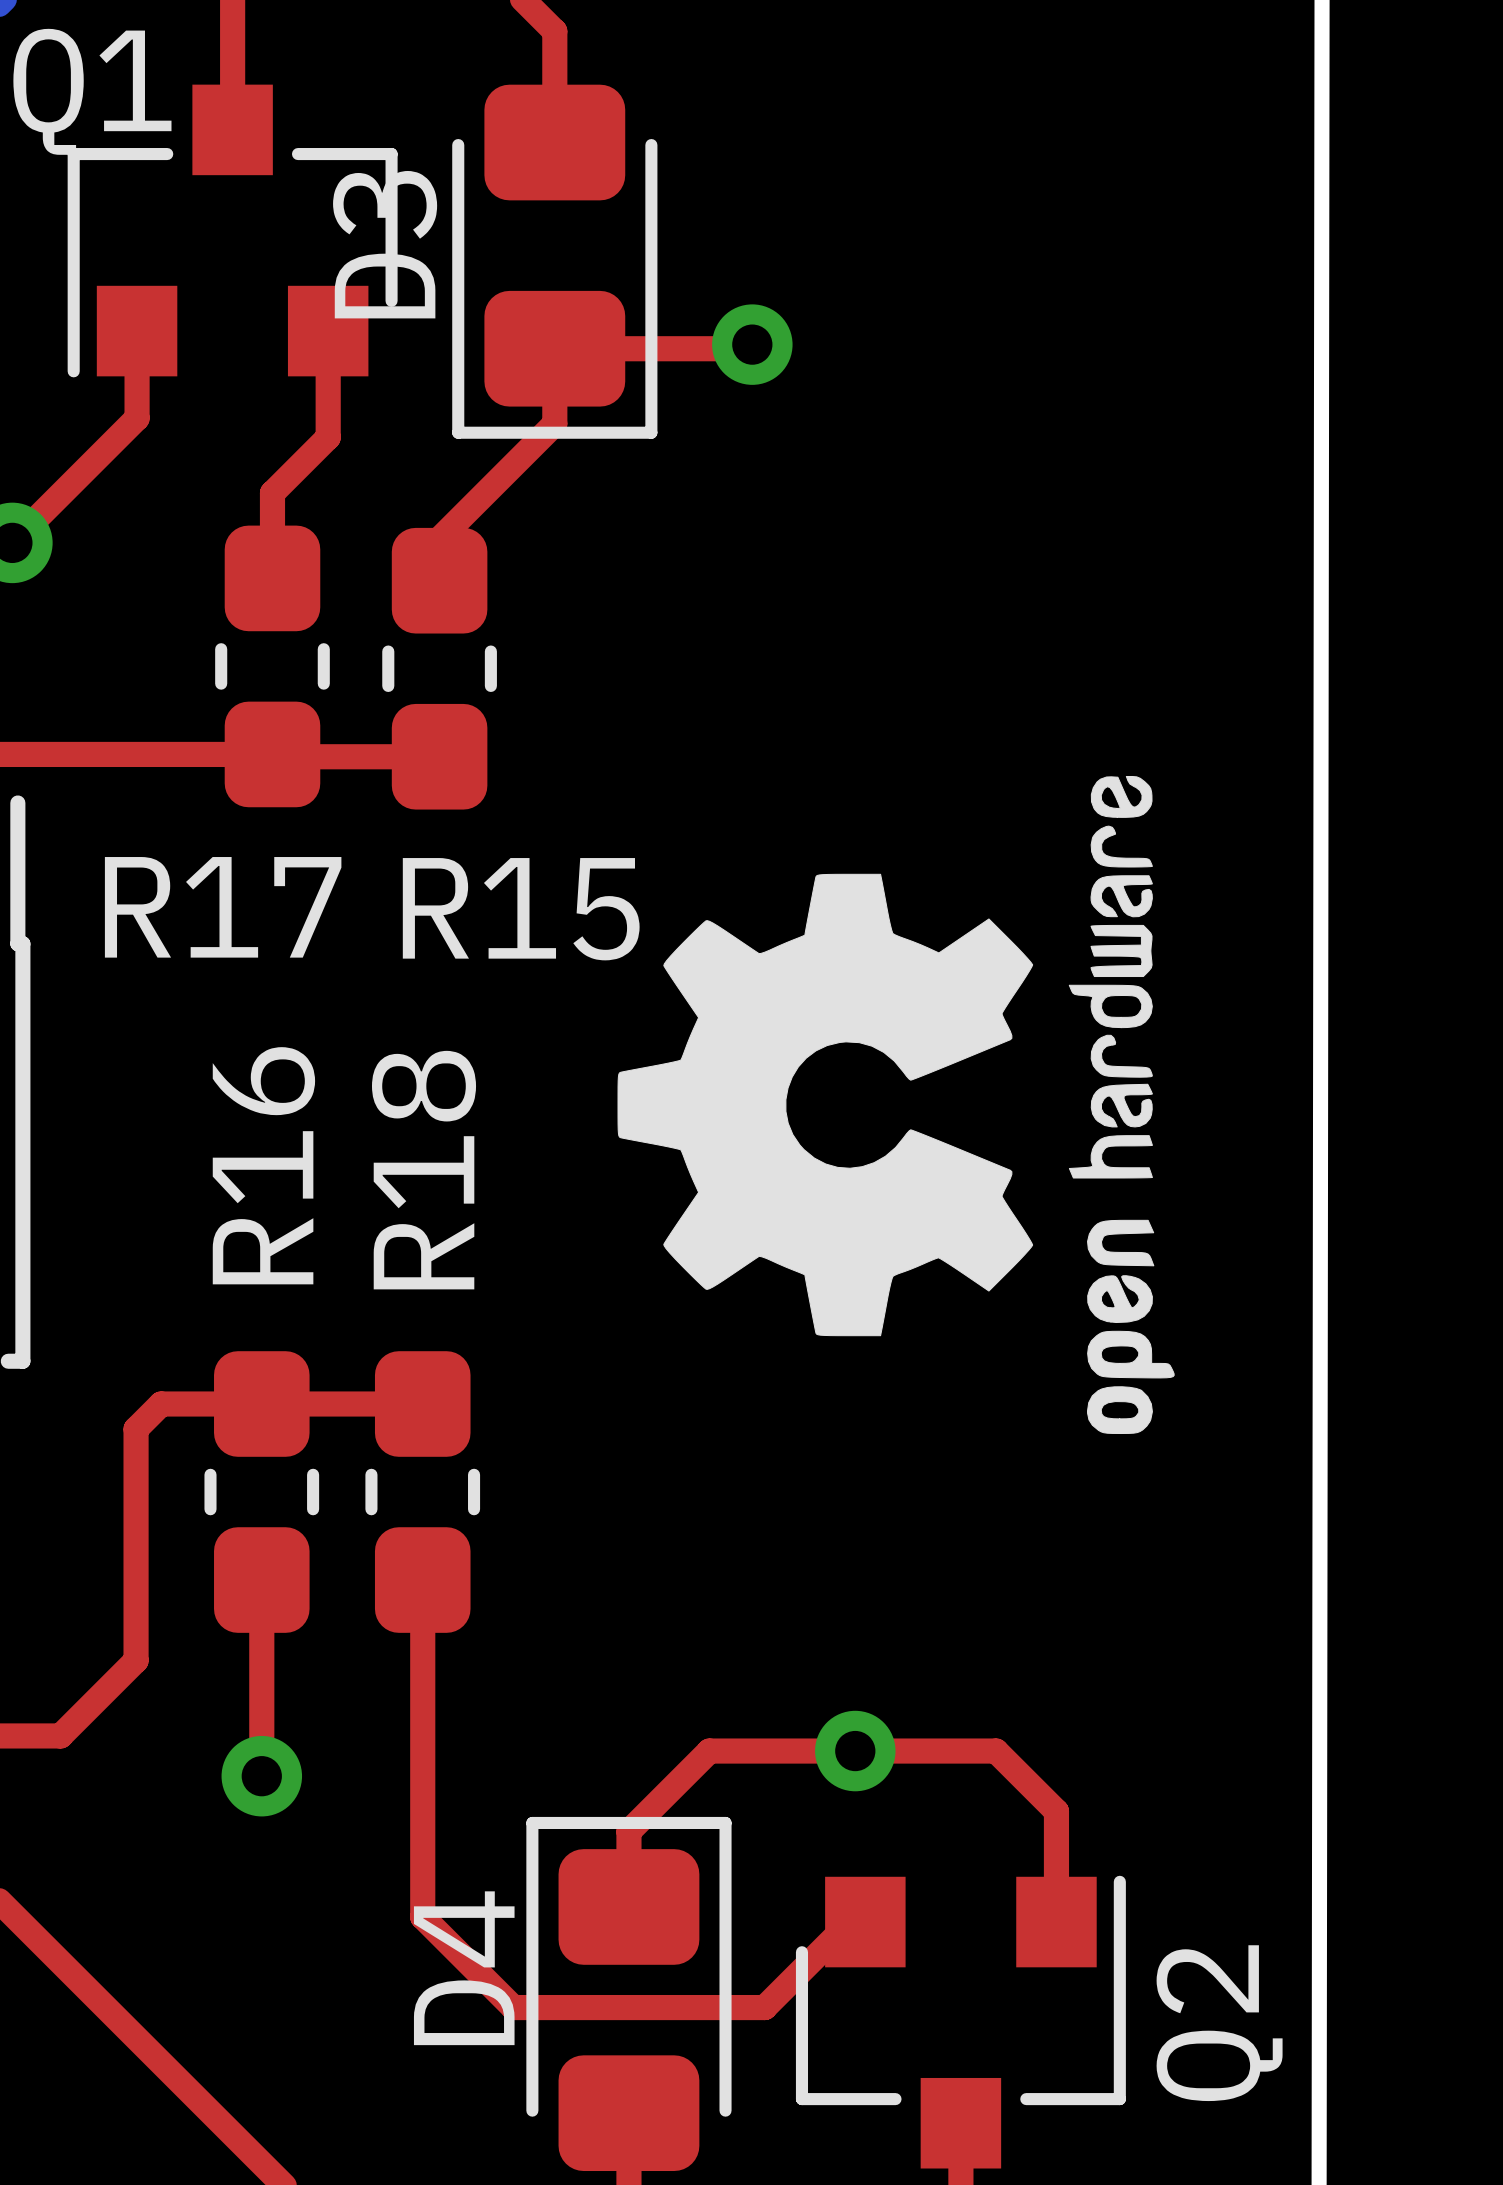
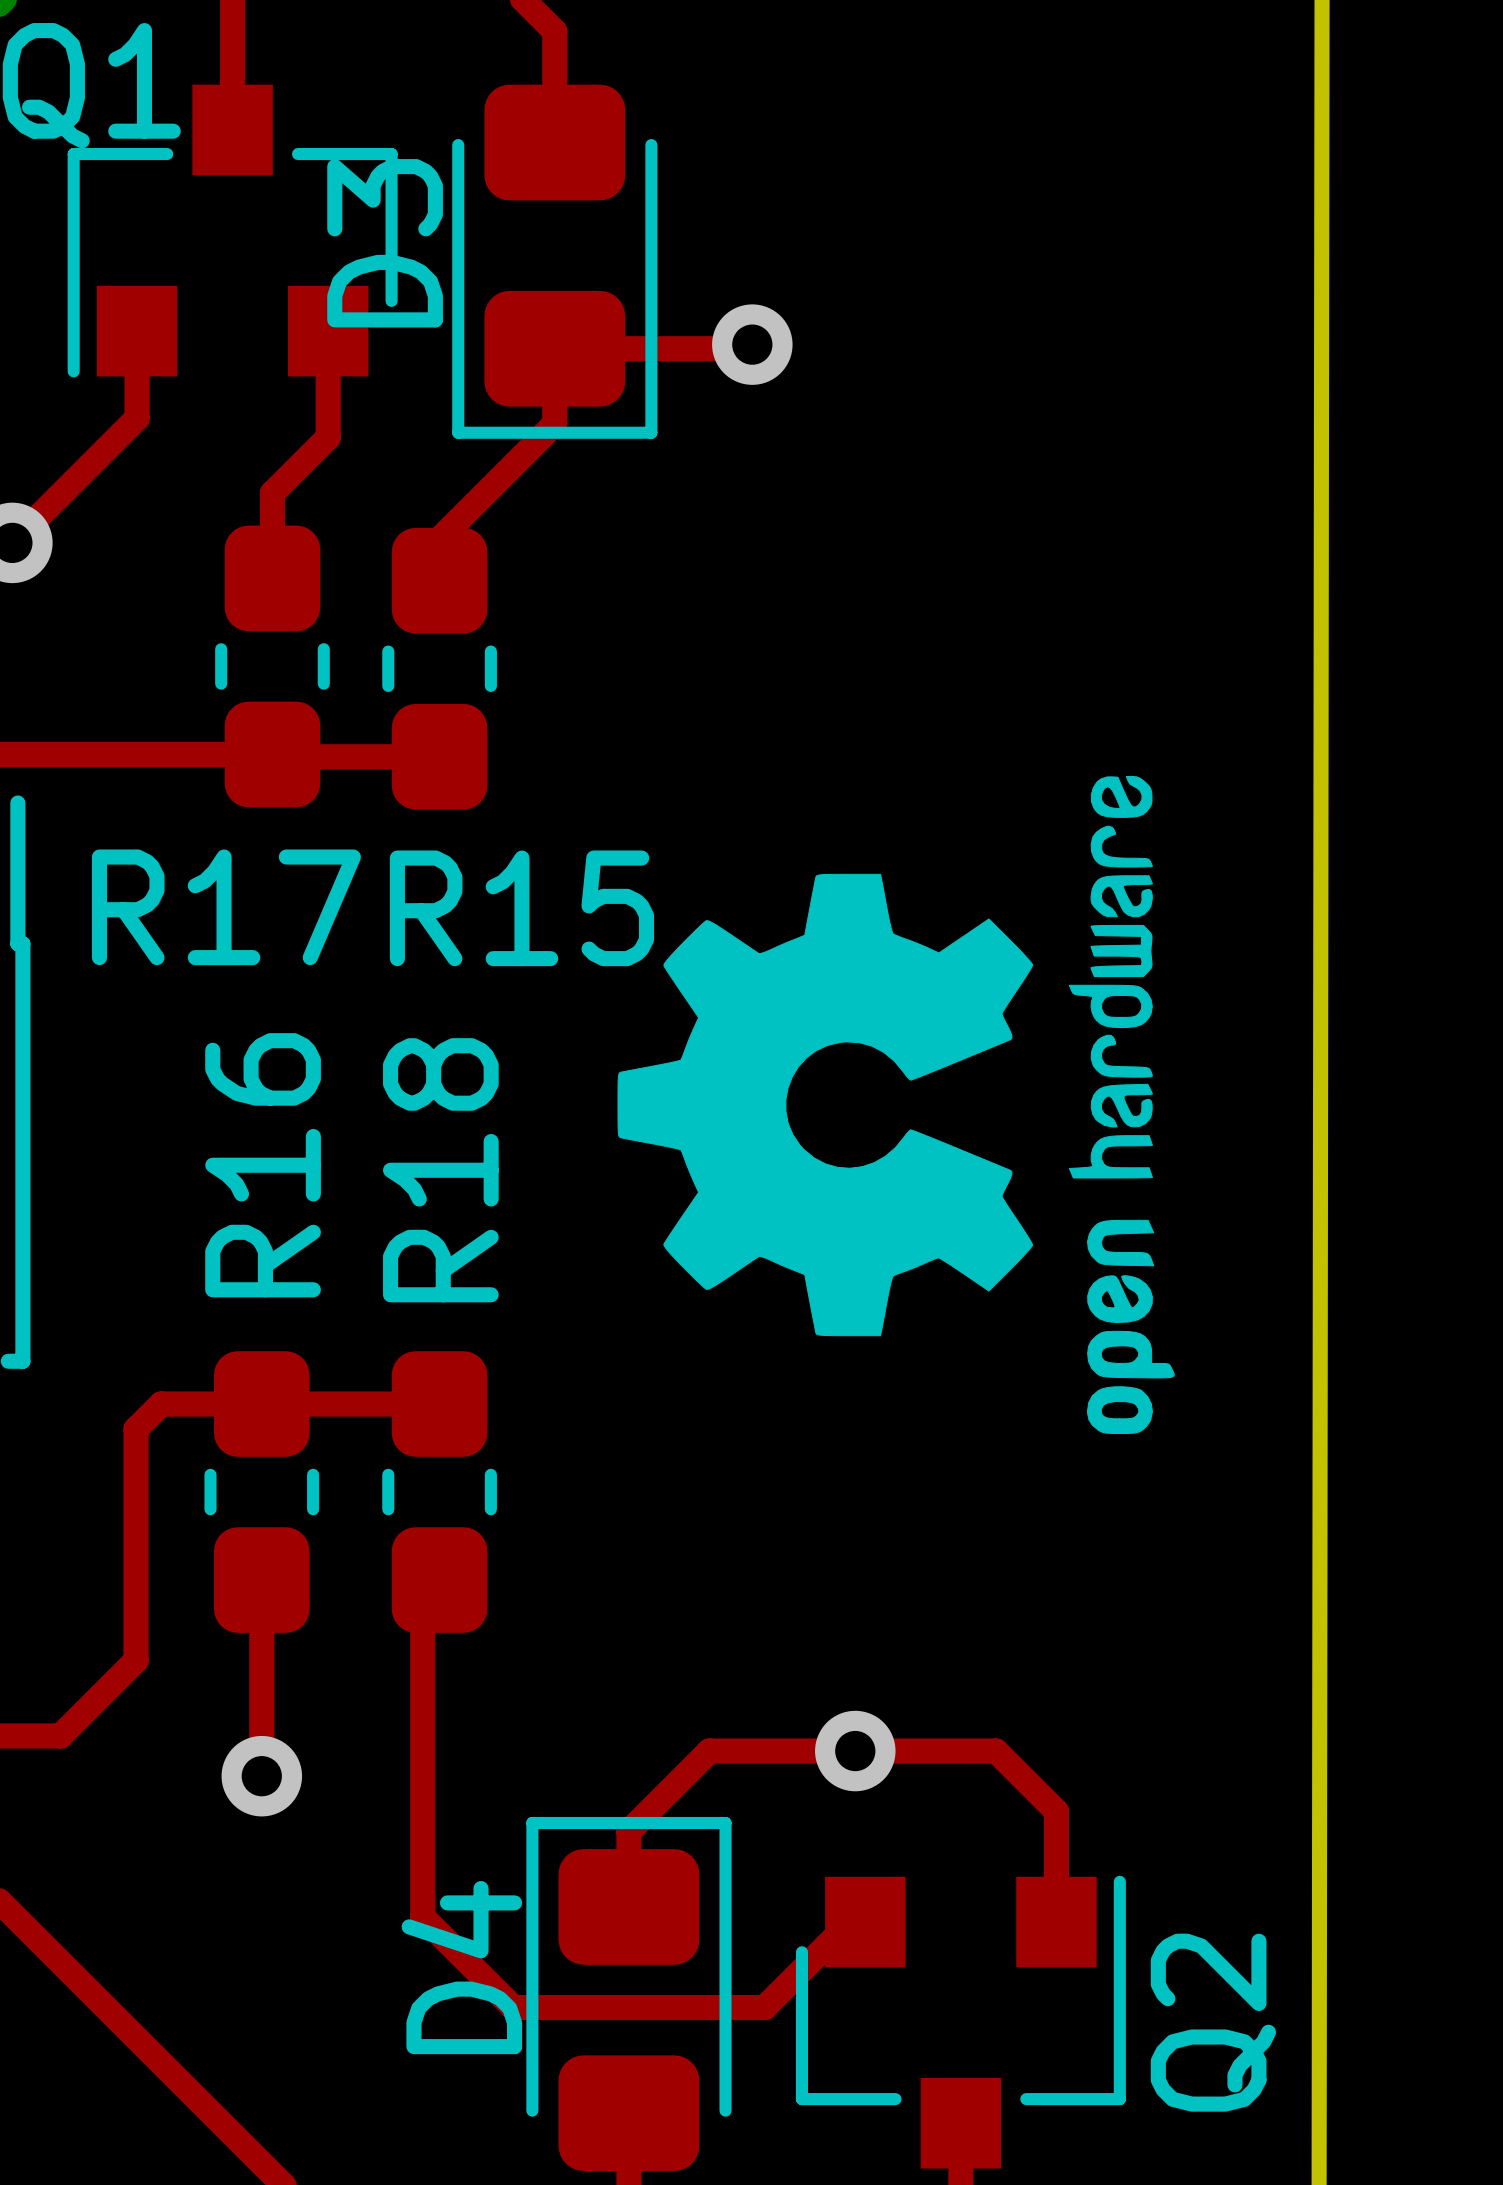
R18 position: (422, 1492) -> (439, 1492)

